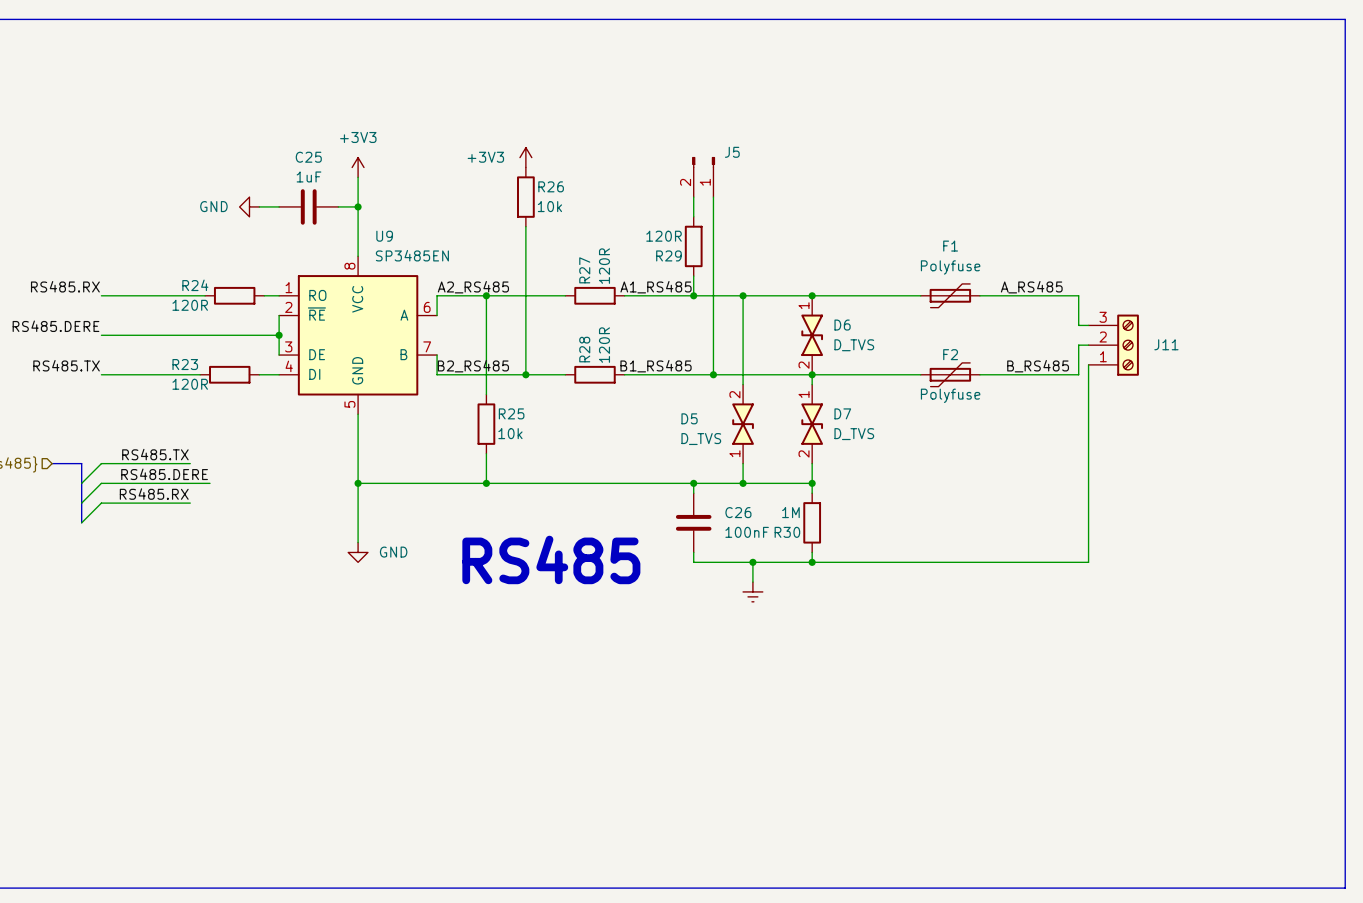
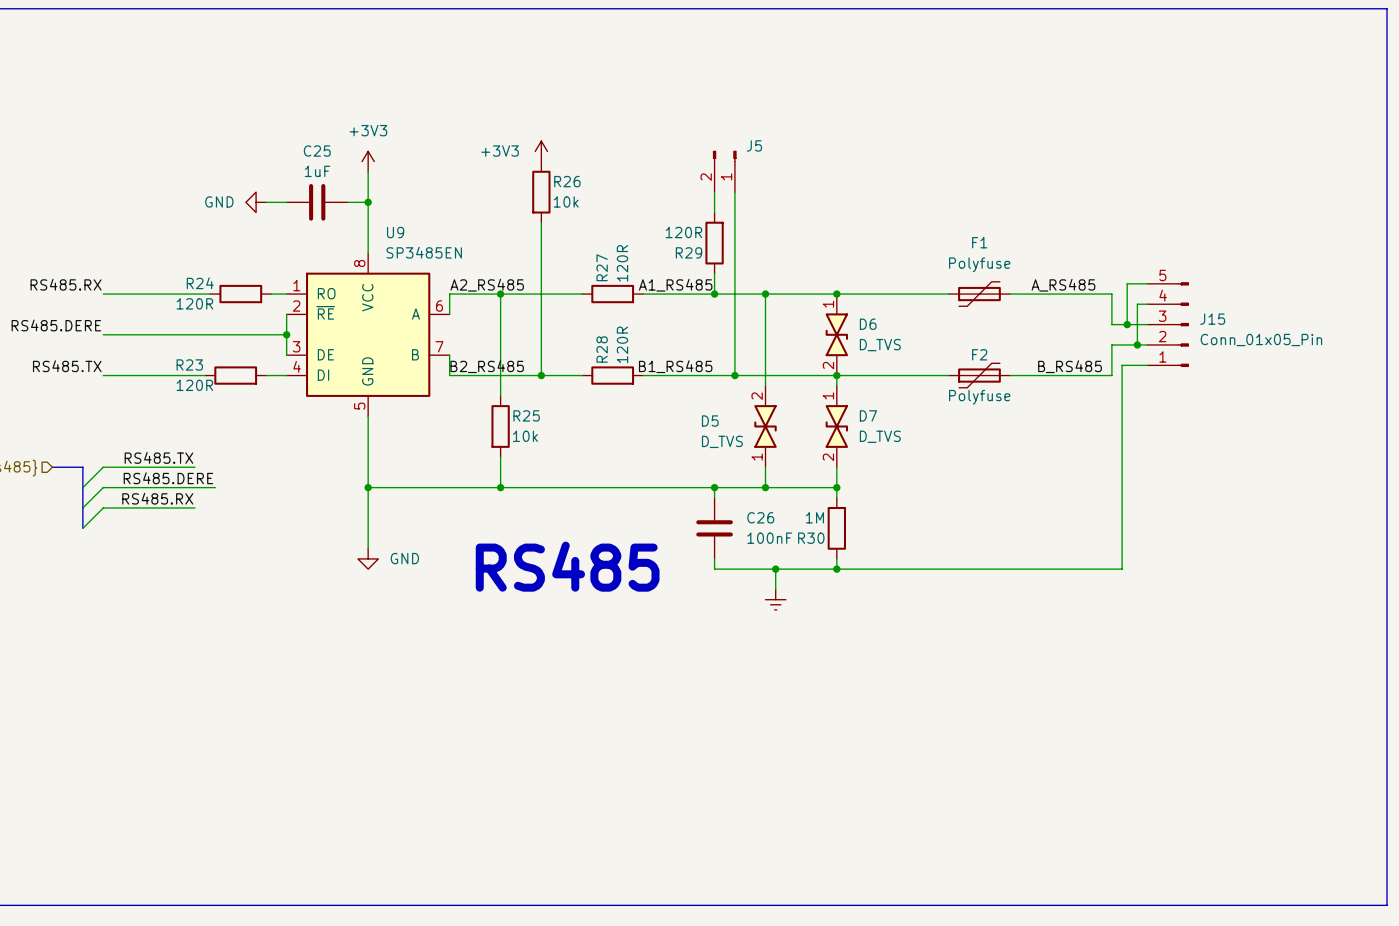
wire: none -> (1147, 283) (1127, 283) (1127, 324)
wire: none -> (1147, 304) (1137, 304) (1137, 344)
junction: none -> (1127, 324)
J15: none -> Conn_01x05_Pin (1168, 324)
junction: none -> (1137, 344)
J11: (1113, 345) -> none

